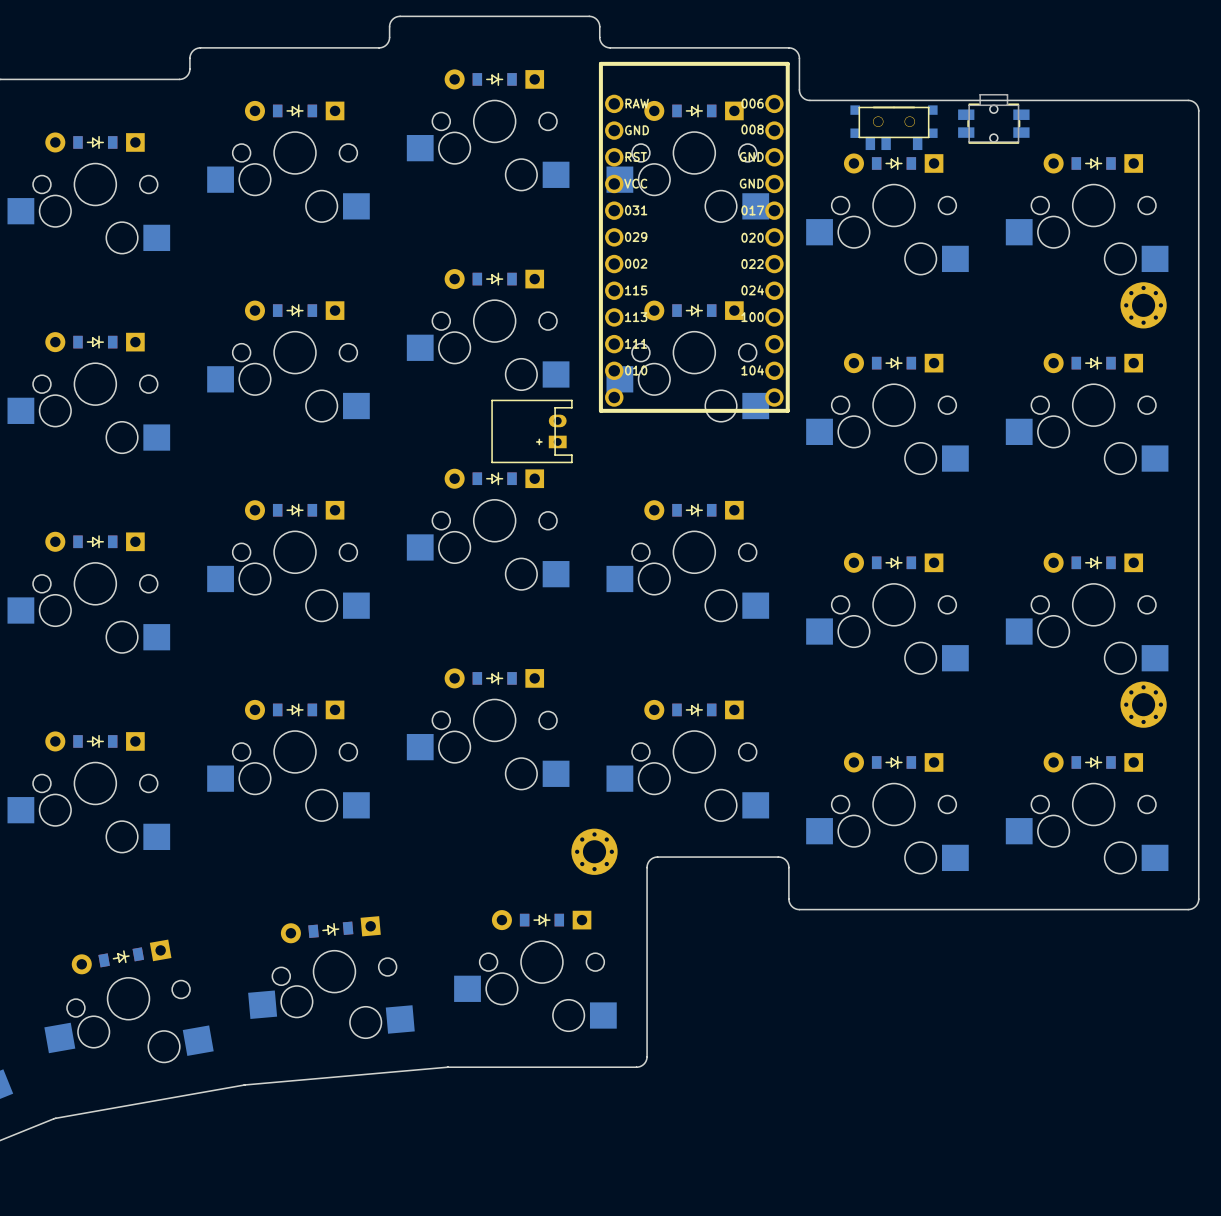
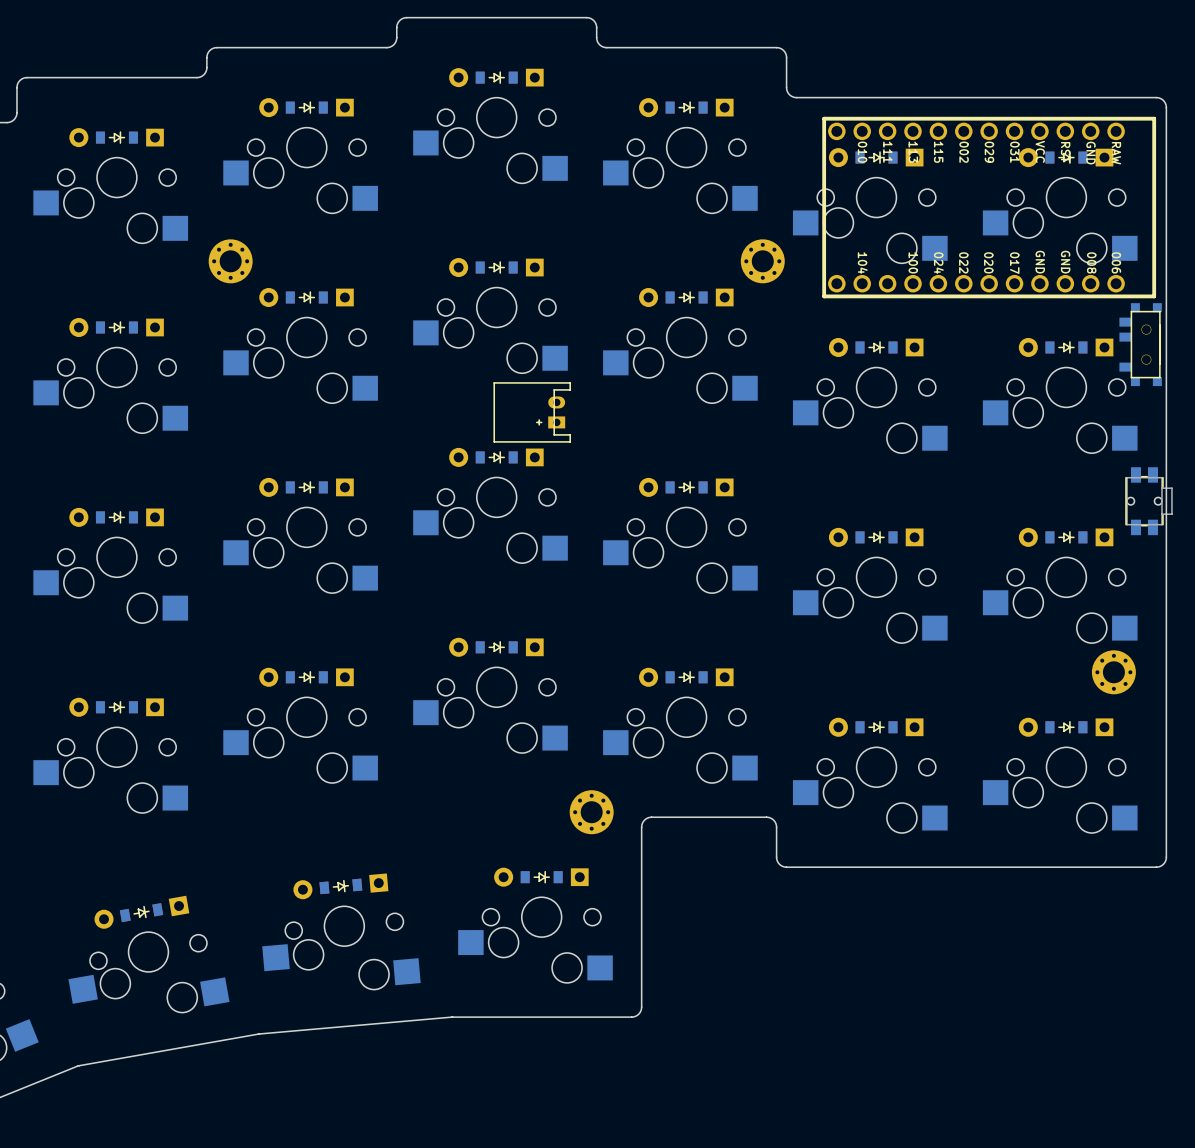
part: (993, 118) -> none
part: (894, 127) -> none
part: none -> (989, 207)
part: (694, 237) -> none
part: none -> (230, 261)
part: none -> (762, 261)
part: (1143, 305) -> none
part: none -> (1140, 344)
part: none -> (1148, 501)

